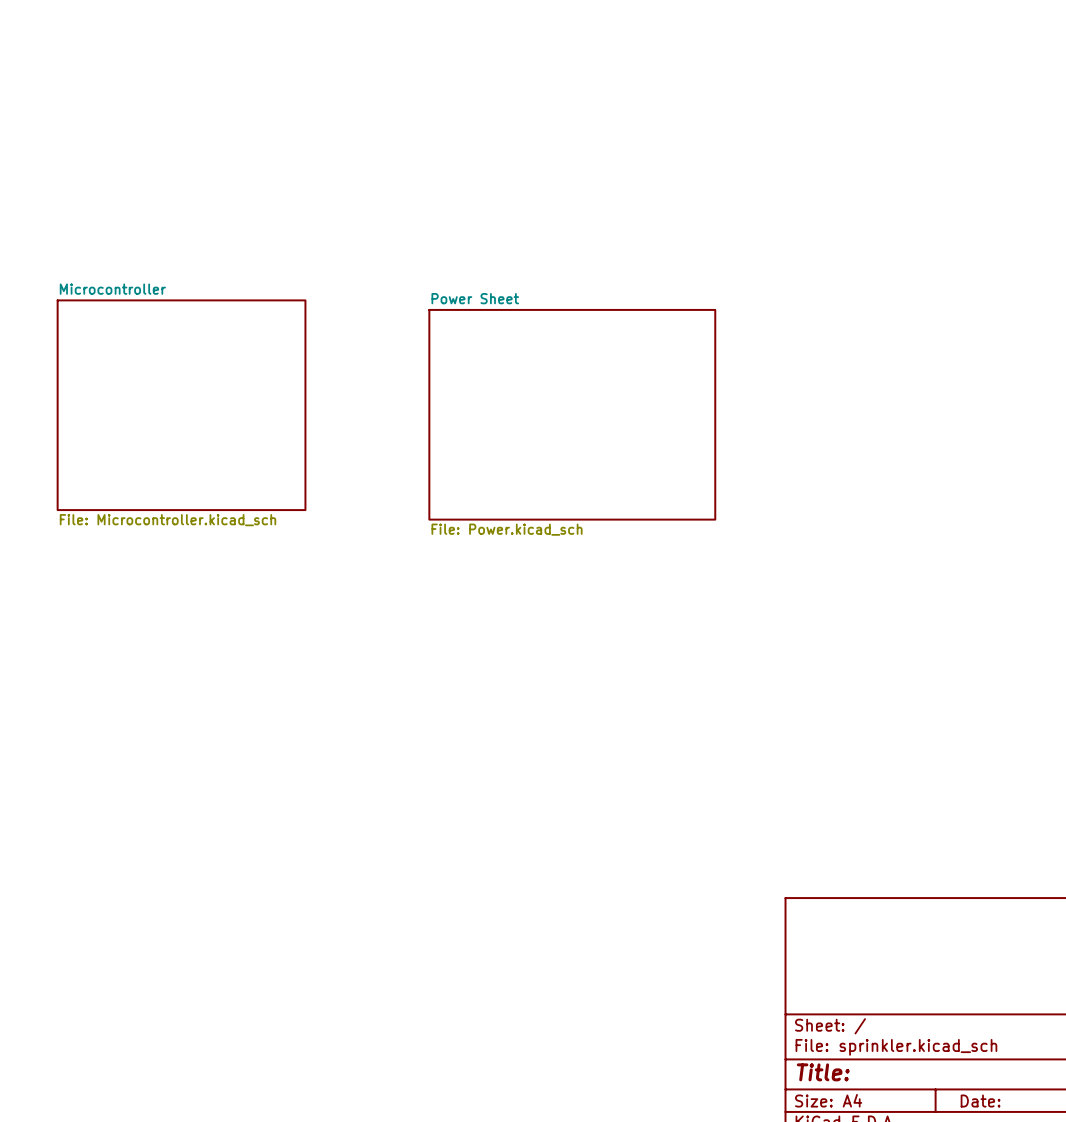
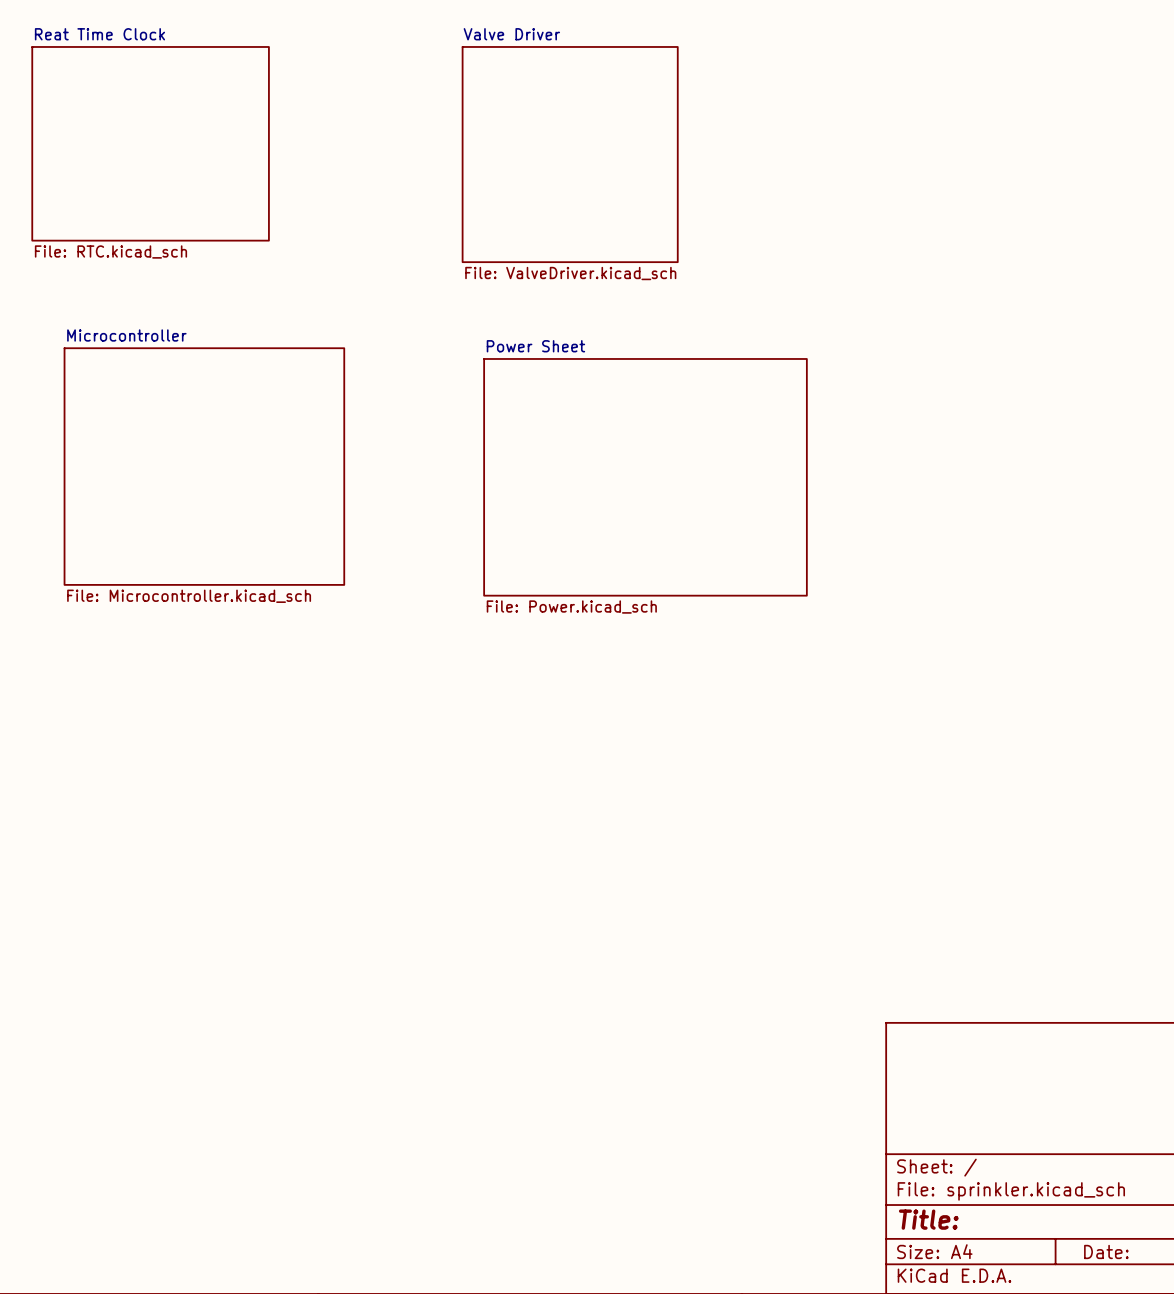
sheet Reat Time Clock: none -> File: RTC.kicad_sch (150, 143)
sheet Valve Driver: none -> File: ValveDriver.kicad_sch (570, 154)

